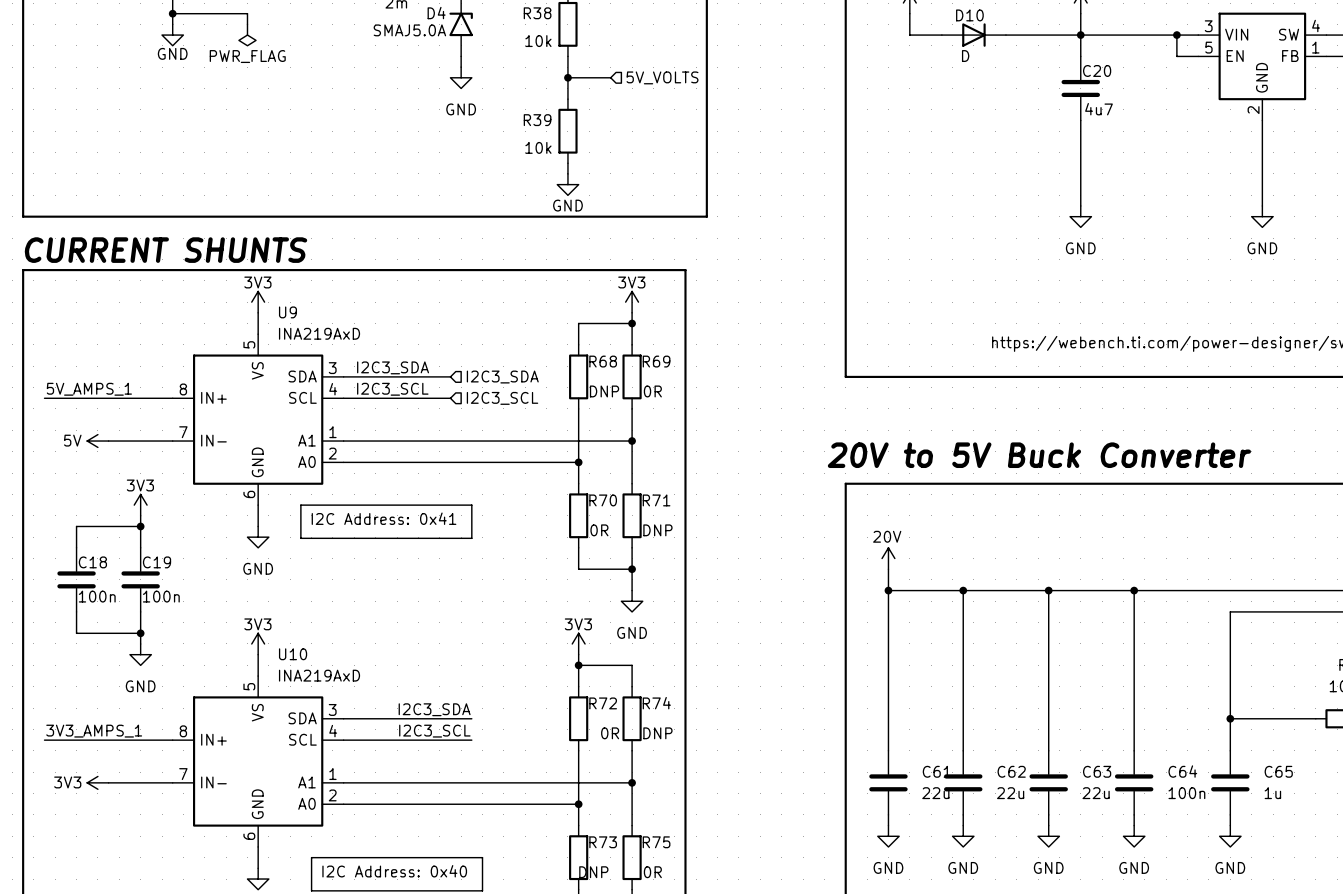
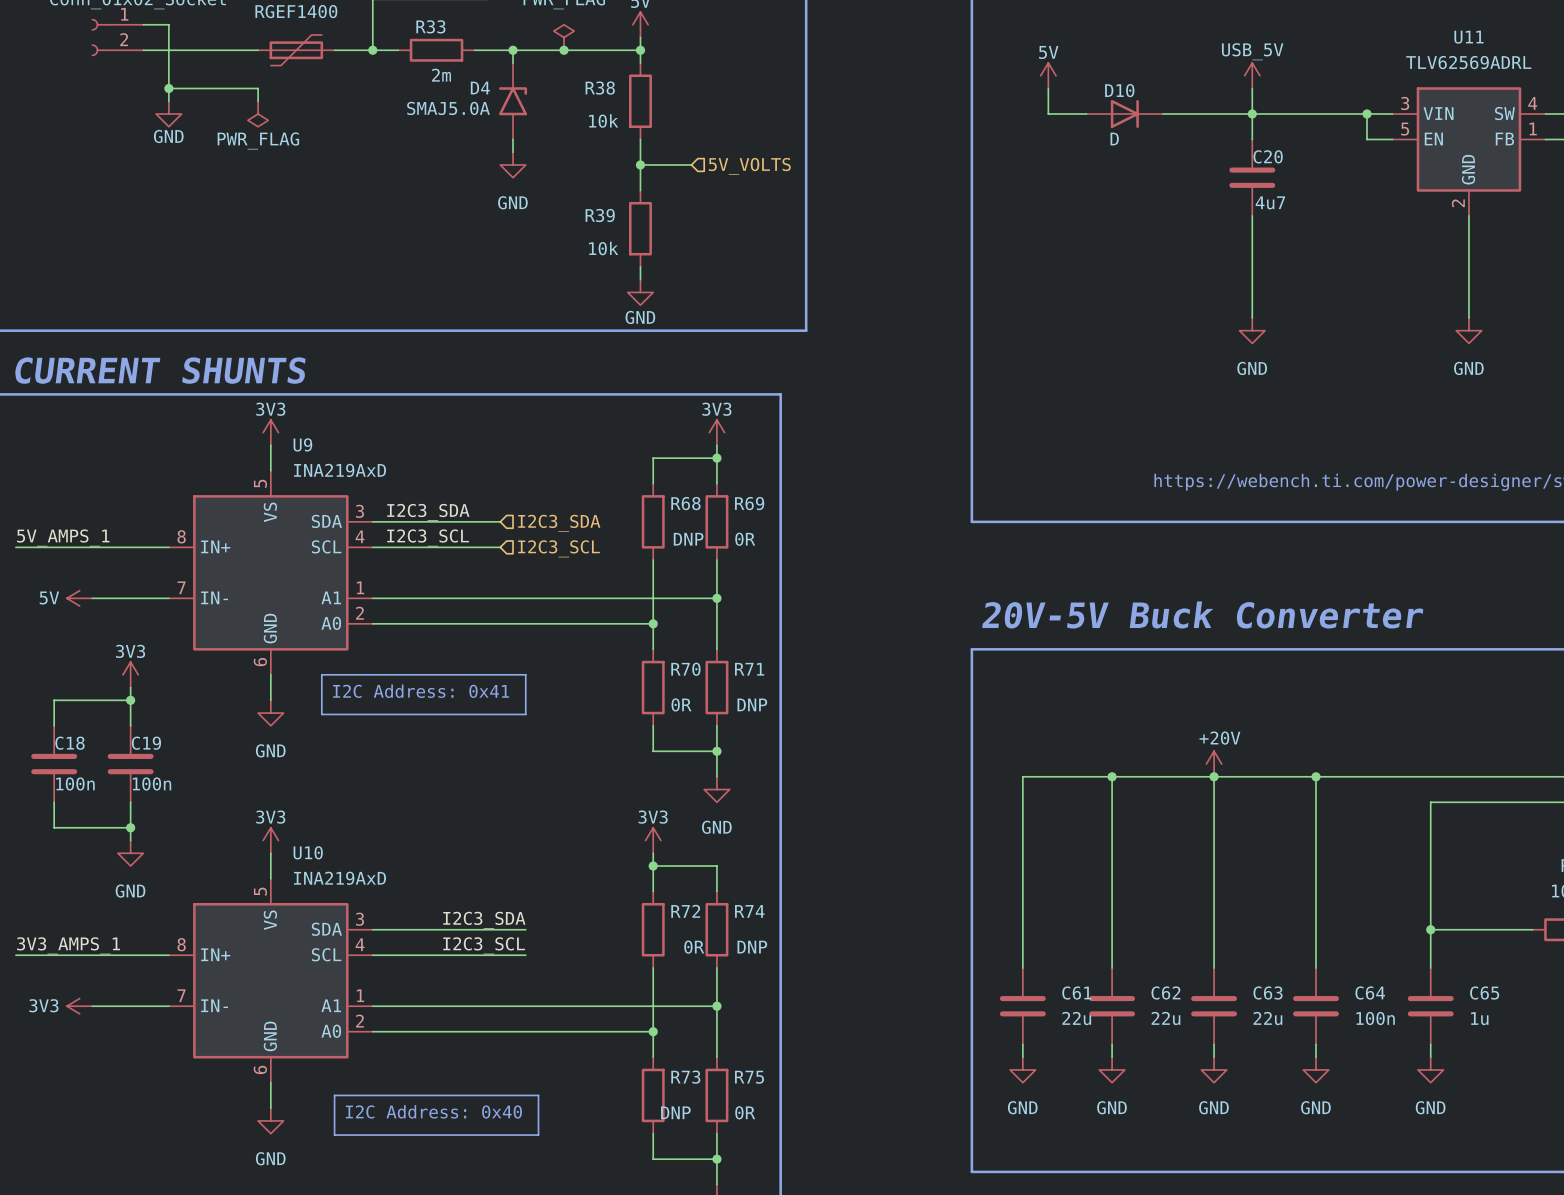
text: 20V to 5V Buck Converter (1039, 455) -> 20V-5V Buck Converter (1202, 614)
power symbol: 20V (888, 558) -> none
wire: (888, 569) (888, 590) -> none
power symbol: none -> +20V (1214, 764)
junction: (888, 590) -> none

